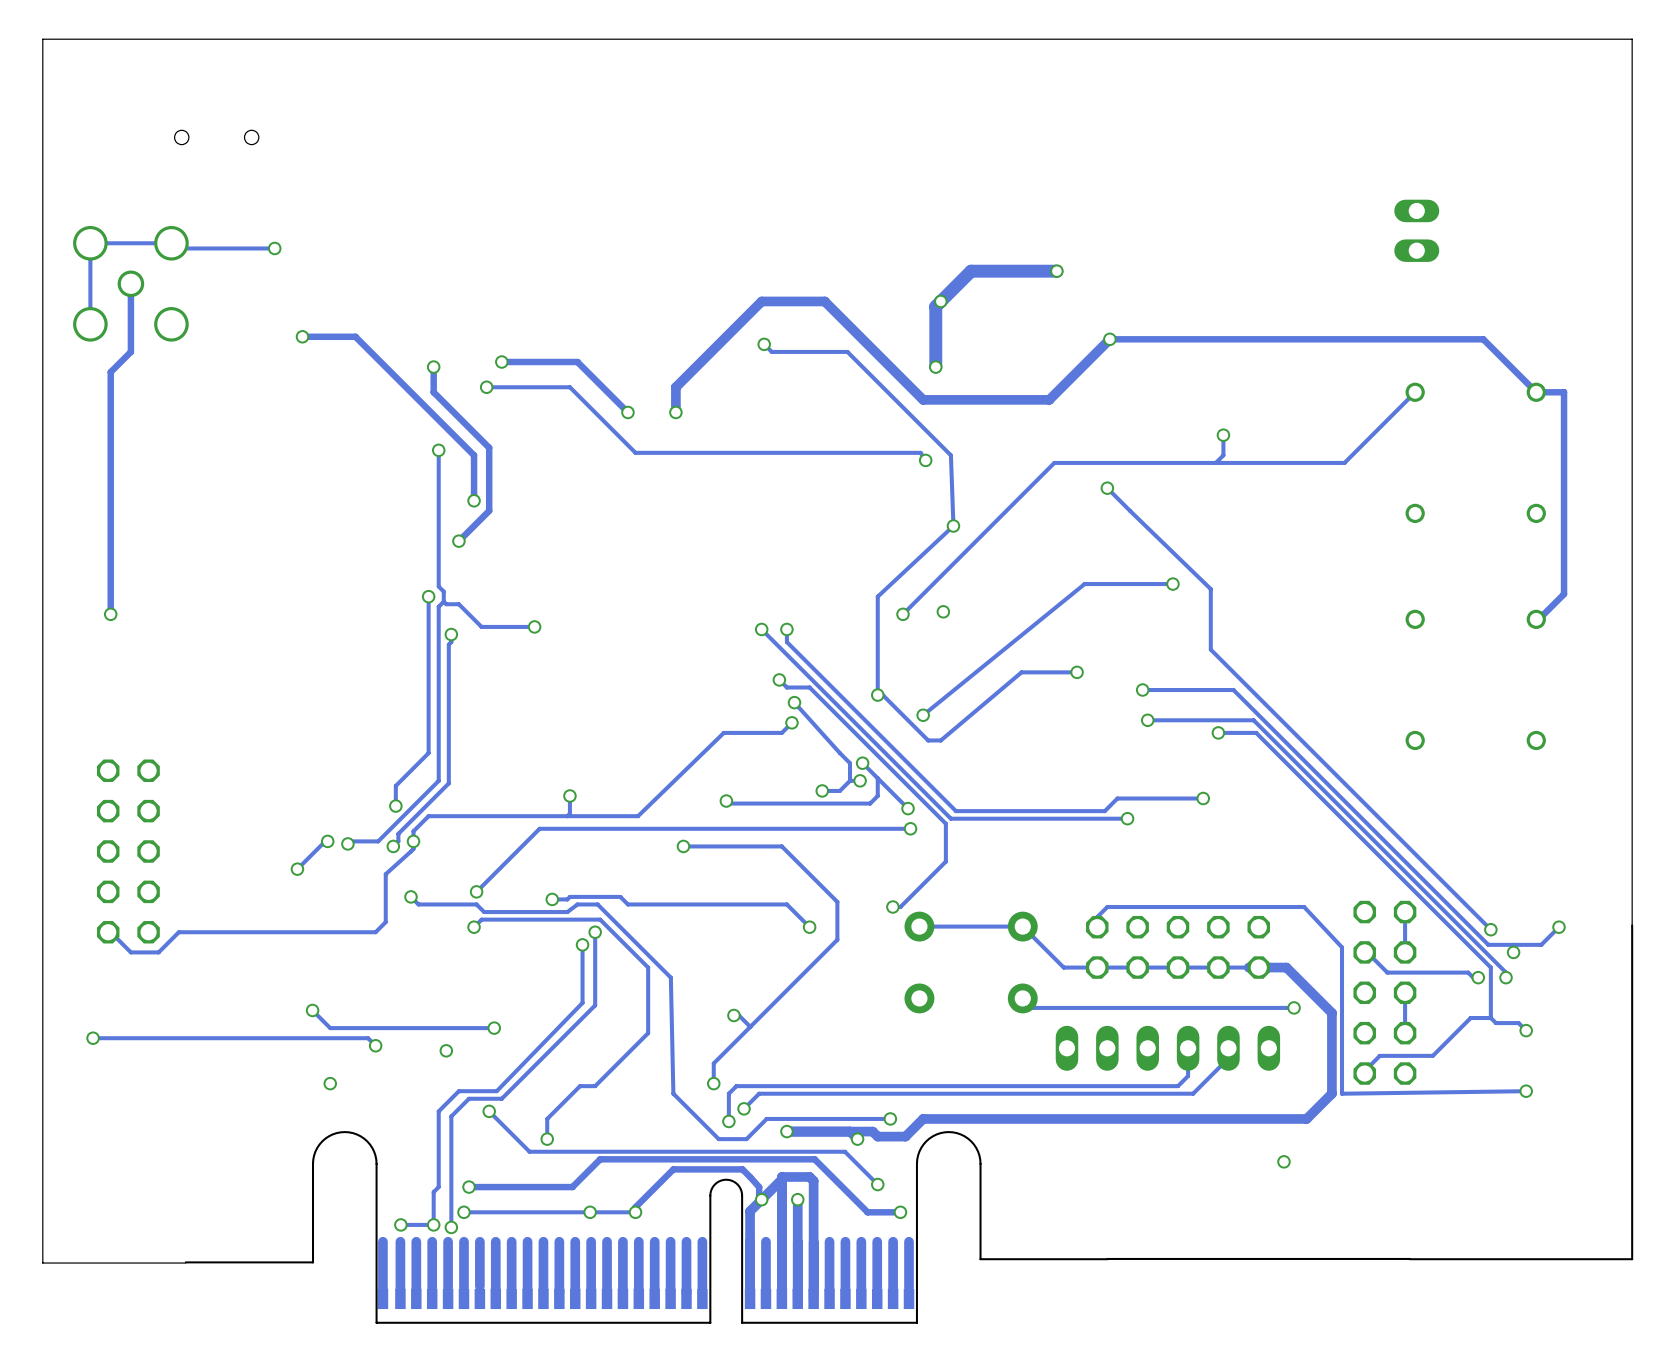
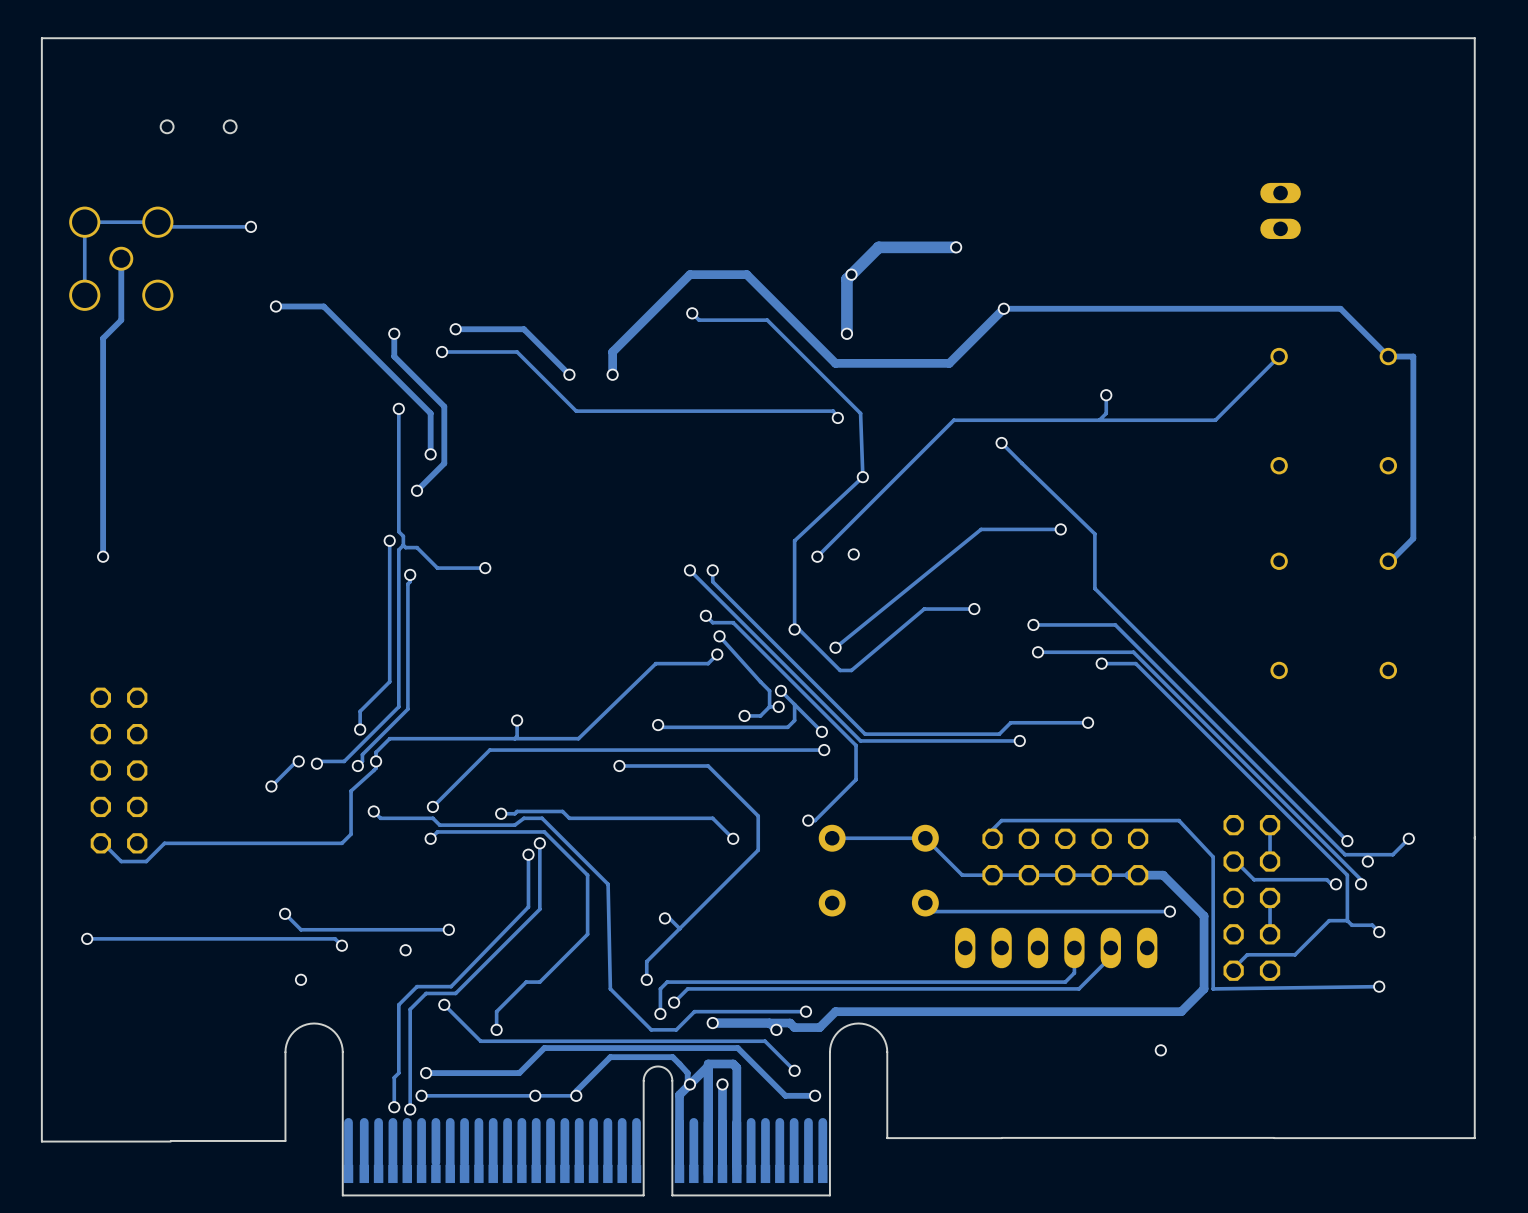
via: (400, 1224) -> none
track: (433, 1224) (400, 1224) -> none

